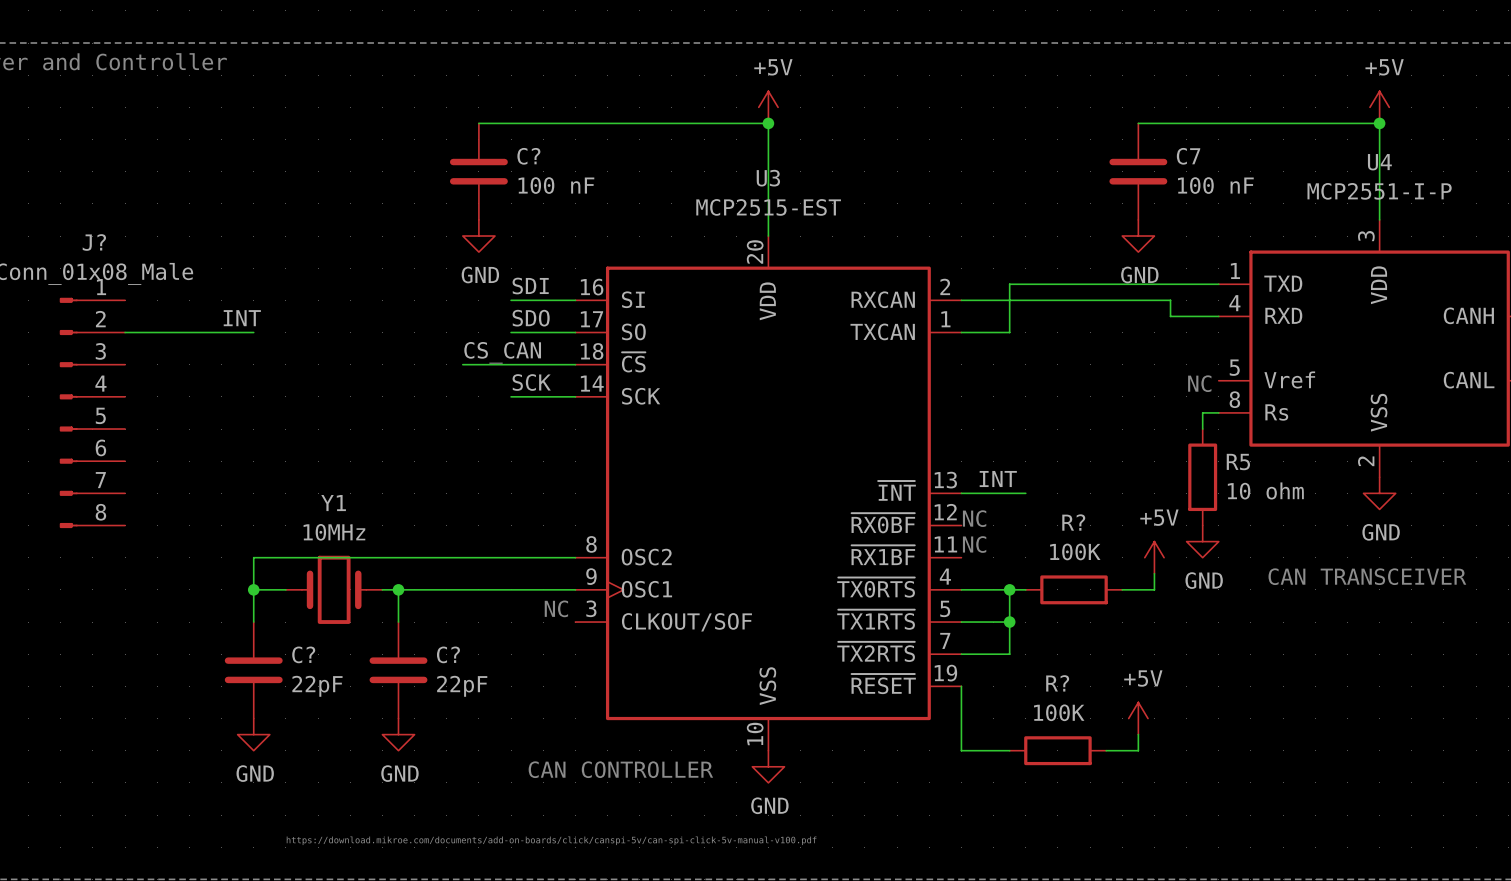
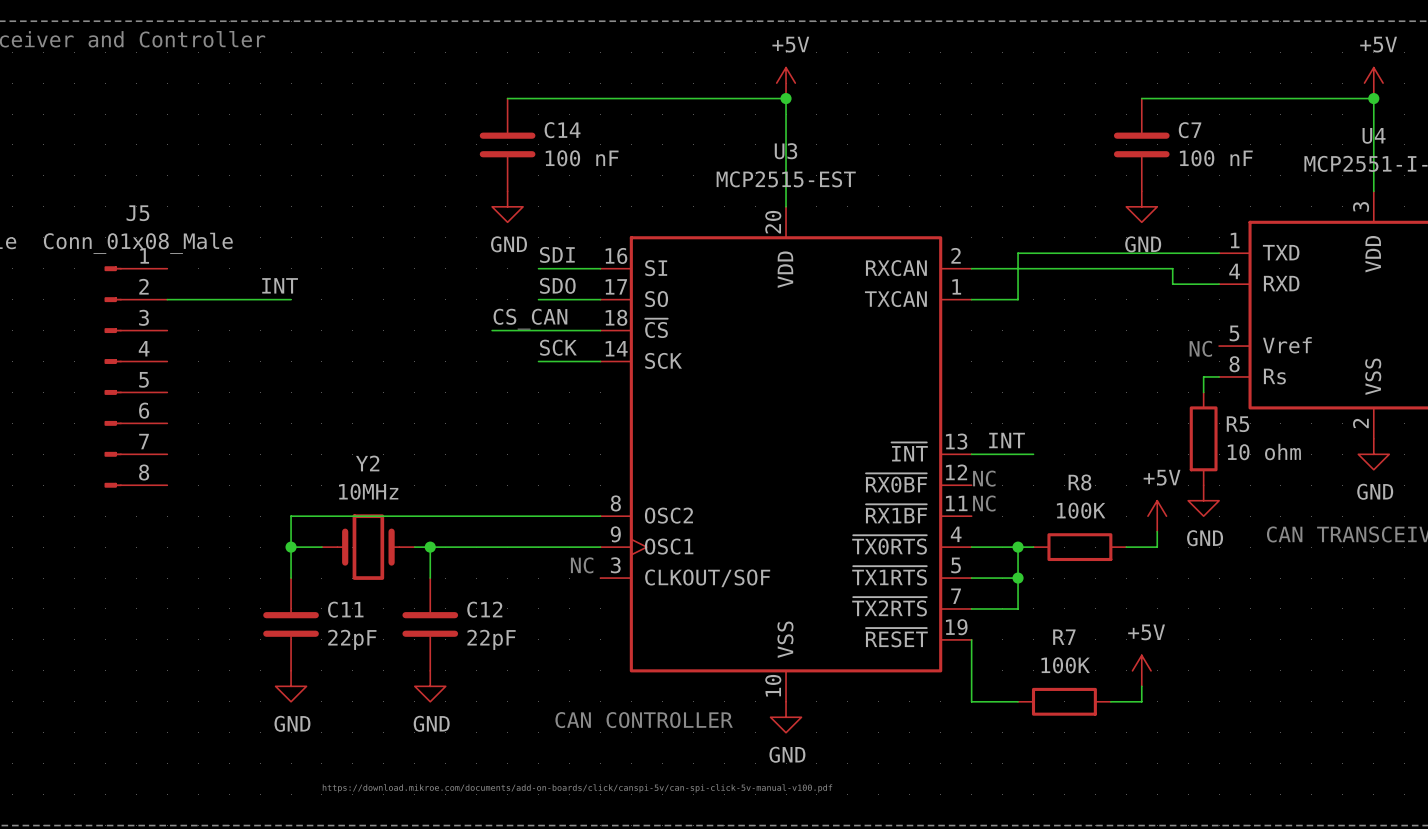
C? name: C? (528, 156) -> C14 (562, 130)
J? name: J? (94, 242) -> J5 (137, 213)
Y1 name: Y1 (333, 503) -> Y2 (367, 463)
R? name: R? (1073, 522) -> R8 (1079, 482)
C? name: C? (303, 654) -> C11 (345, 609)
C? name: C? (448, 654) -> C12 (484, 609)
R? name: R? (1057, 683) -> R7 (1064, 637)

